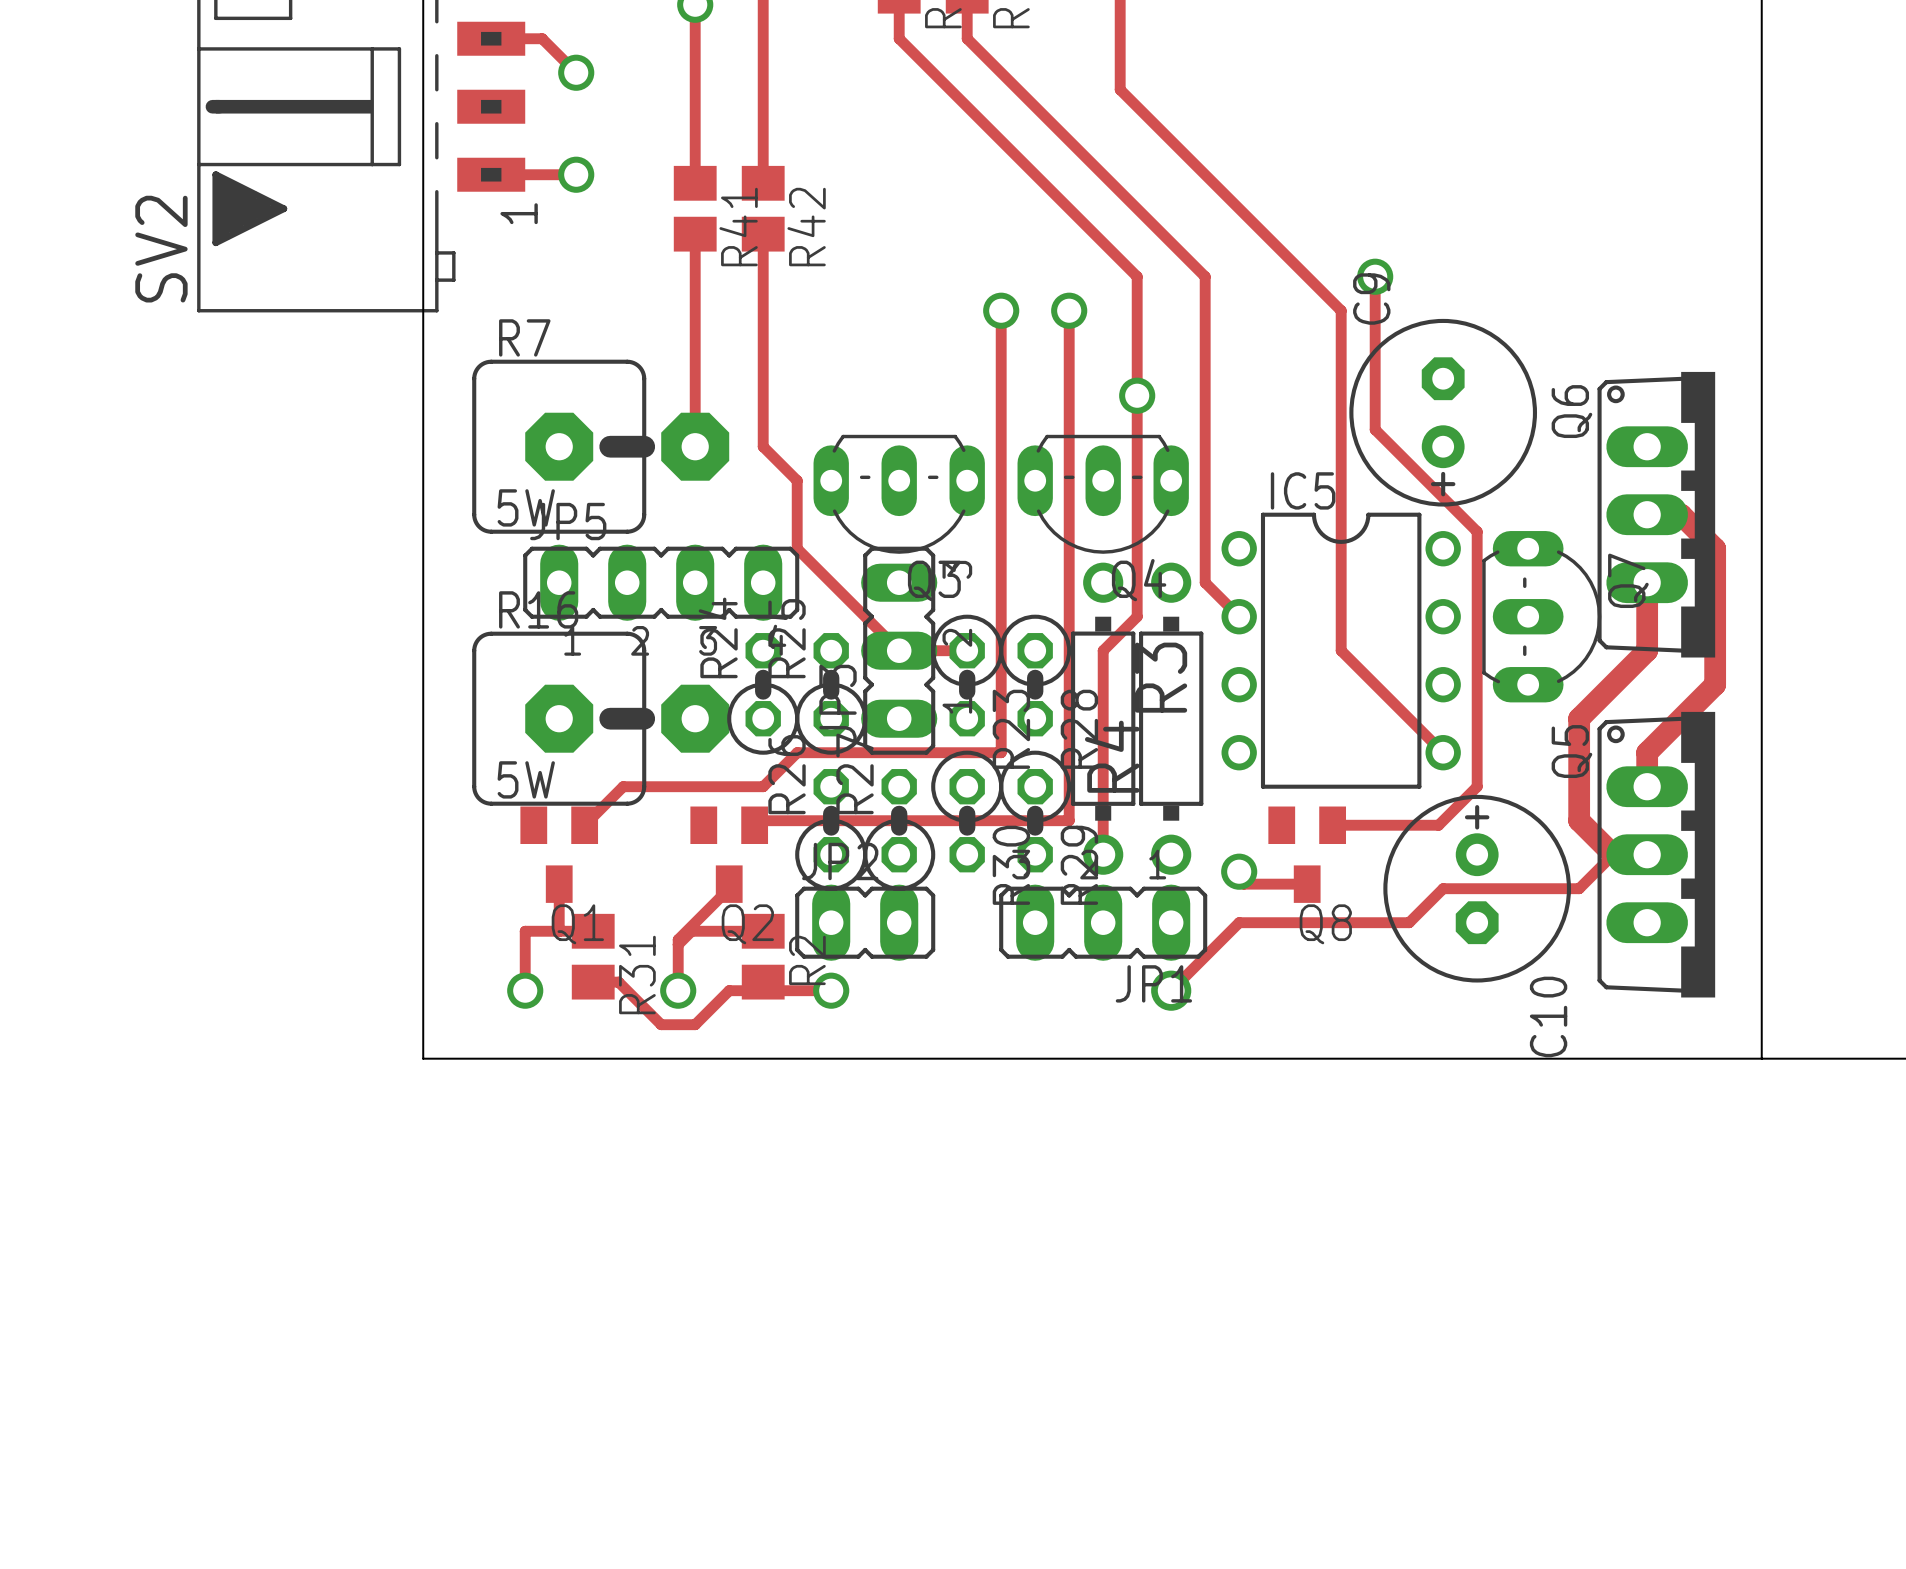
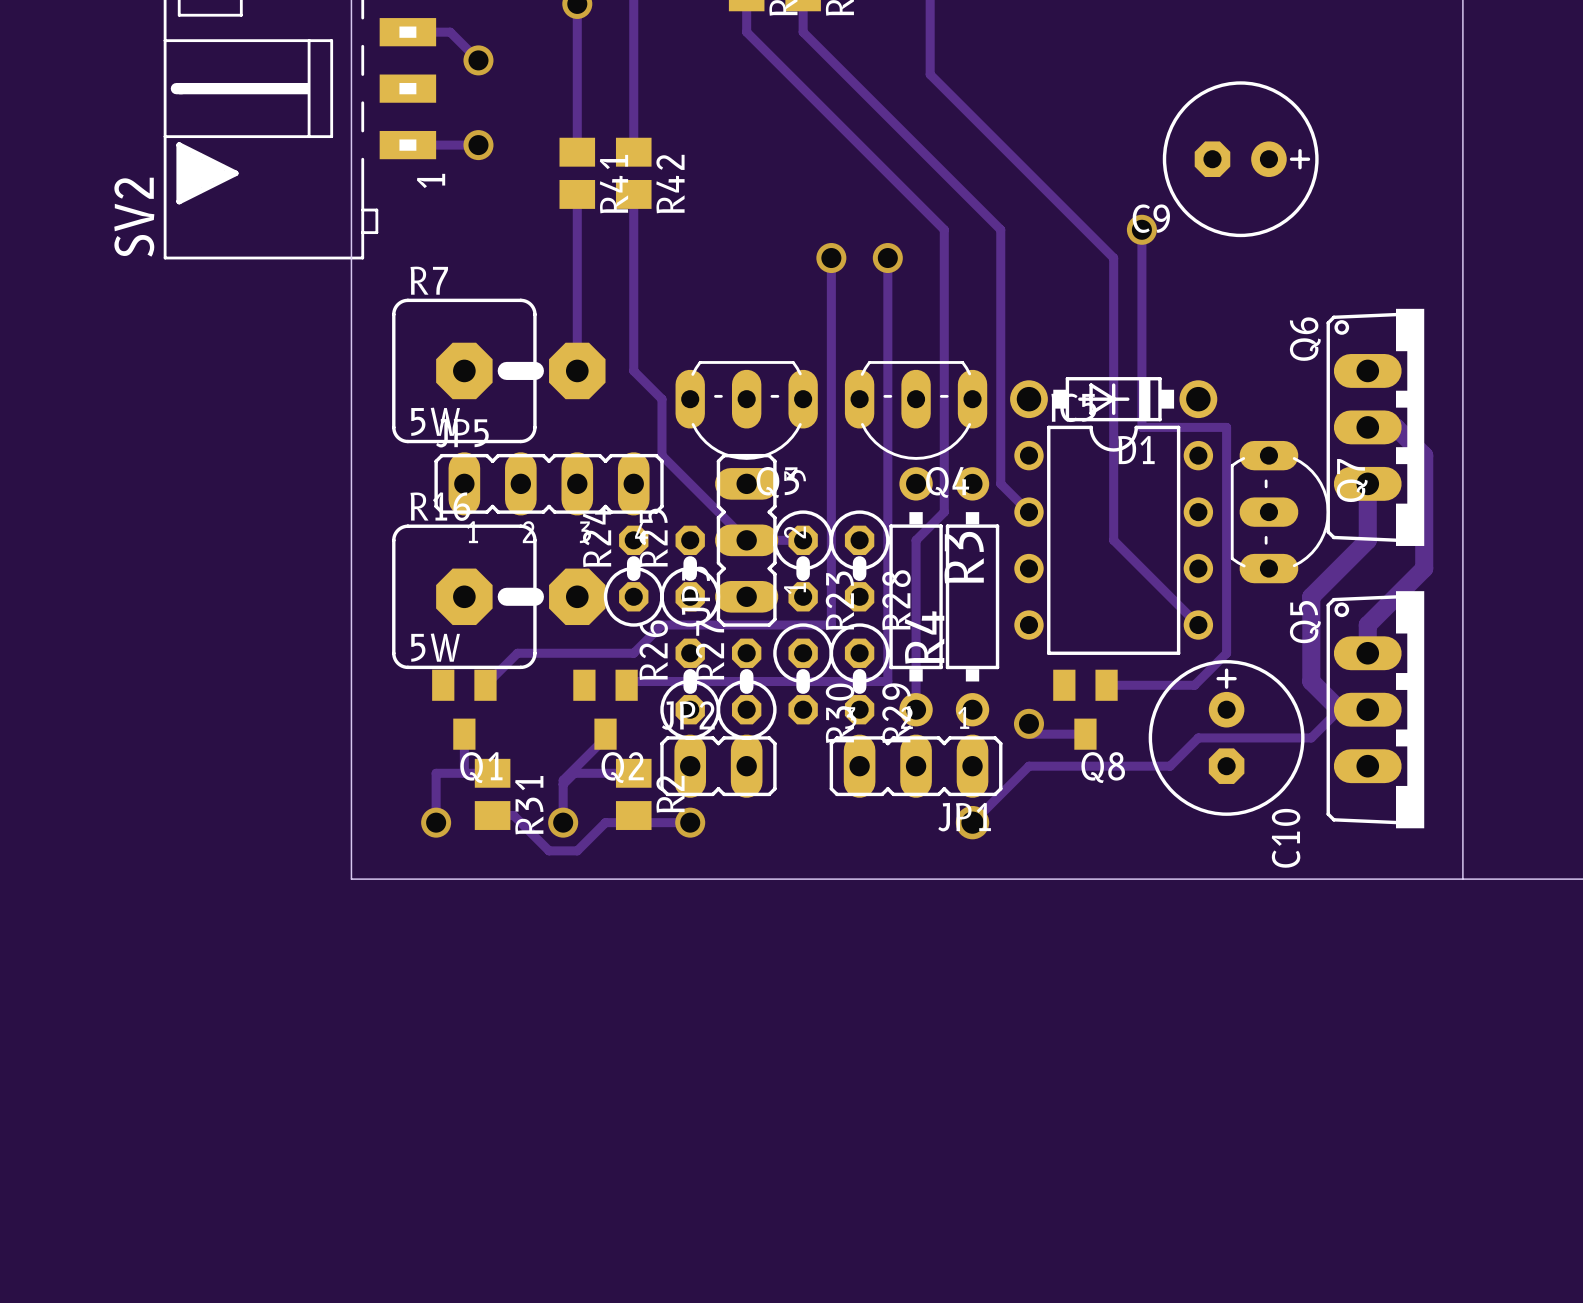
via: (1137, 395) -> none
C9 rotation: 0° (1443, 412) -> 90° counterclockwise (1240, 159)
C9 position: (1443, 412) -> (1240, 159)
track: (1375, 429) (1477, 531) -> (1141, 356) (1141, 427) (1226, 427) (1226, 441)
D1: none -> (1113, 399)

